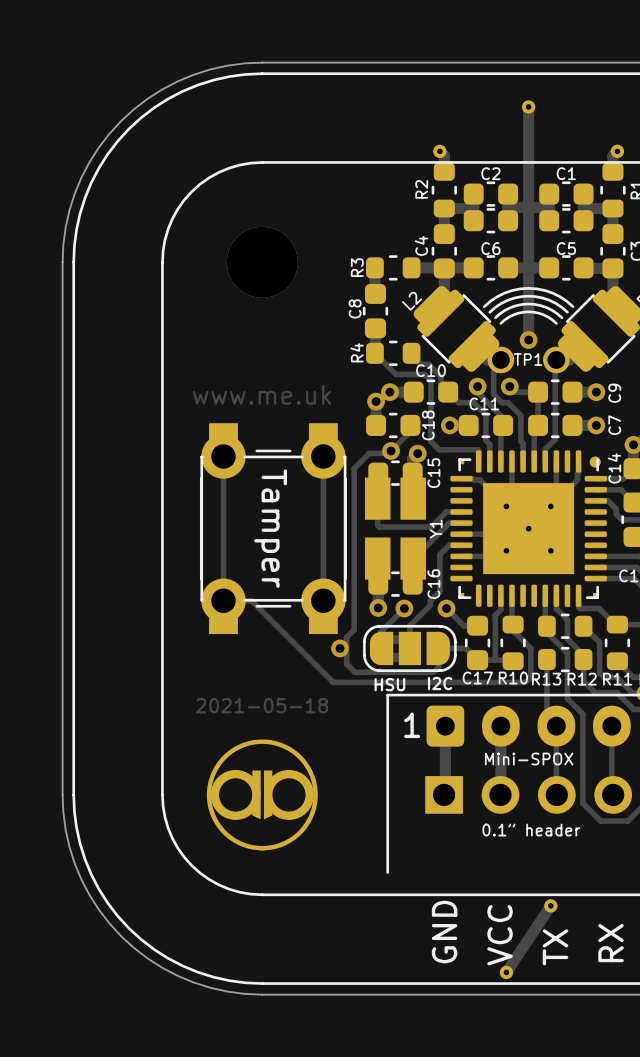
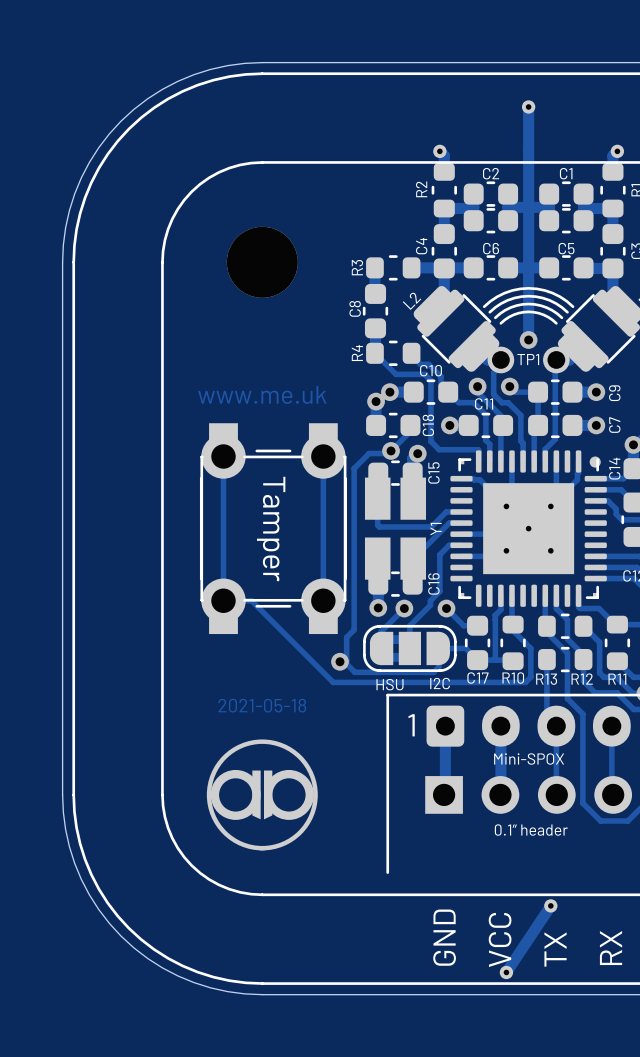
via position: (340, 648) -> (340, 661)

